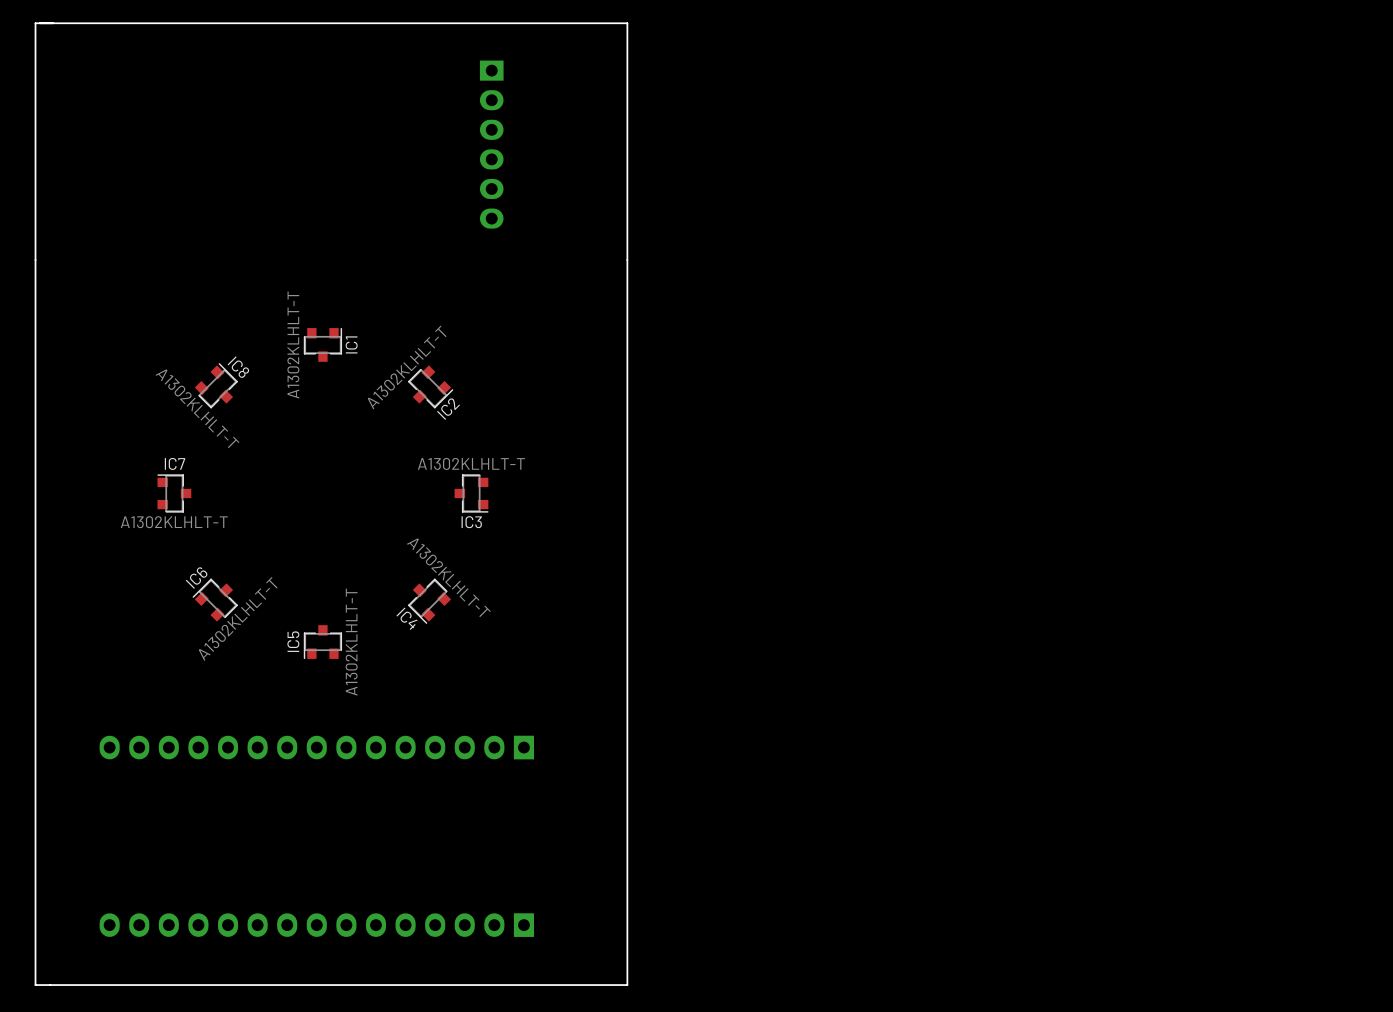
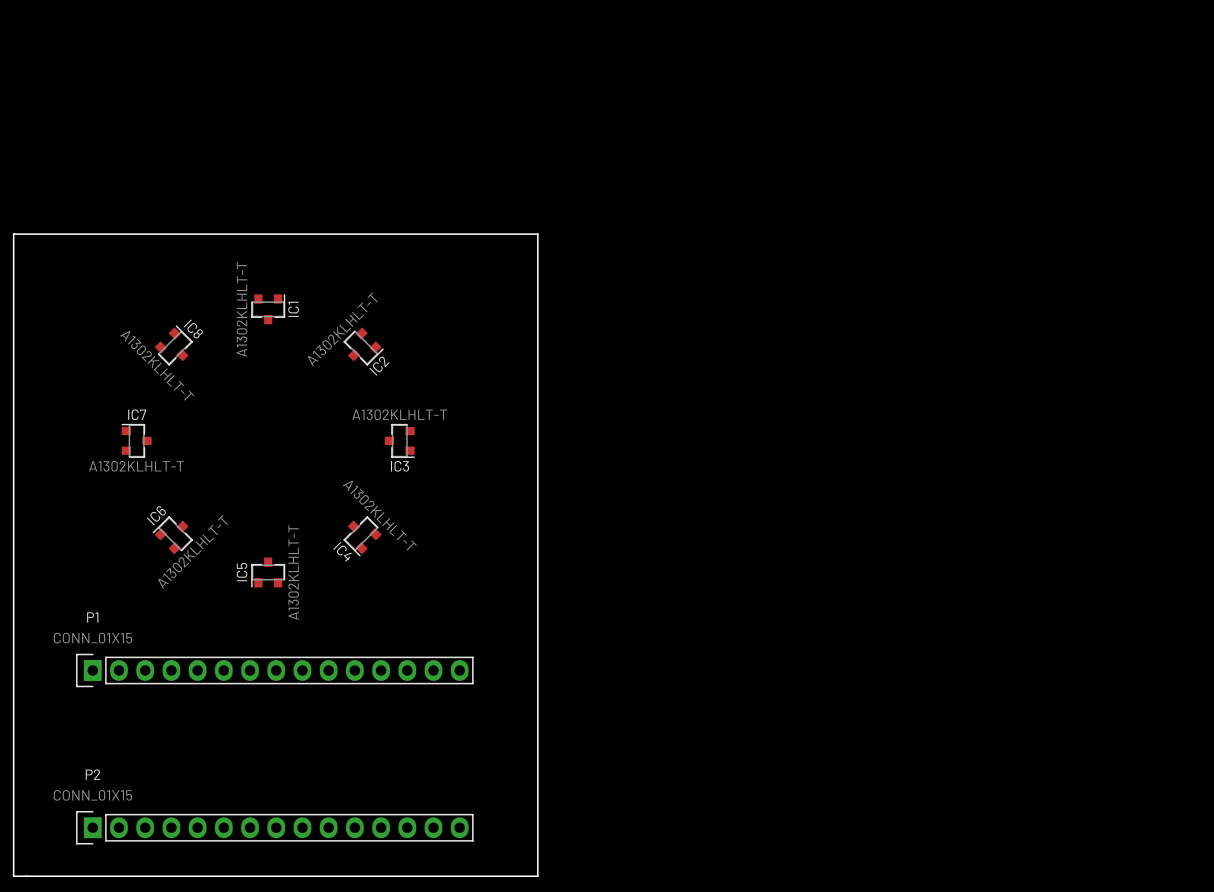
part: (491, 144) -> none
board edge: (35, 260) (35, 23) (627, 23) (627, 260) -> (13, 234) (537, 234)
P1 side: bottom (316, 747) -> top (274, 670)
P2 side: bottom (316, 925) -> top (274, 827)

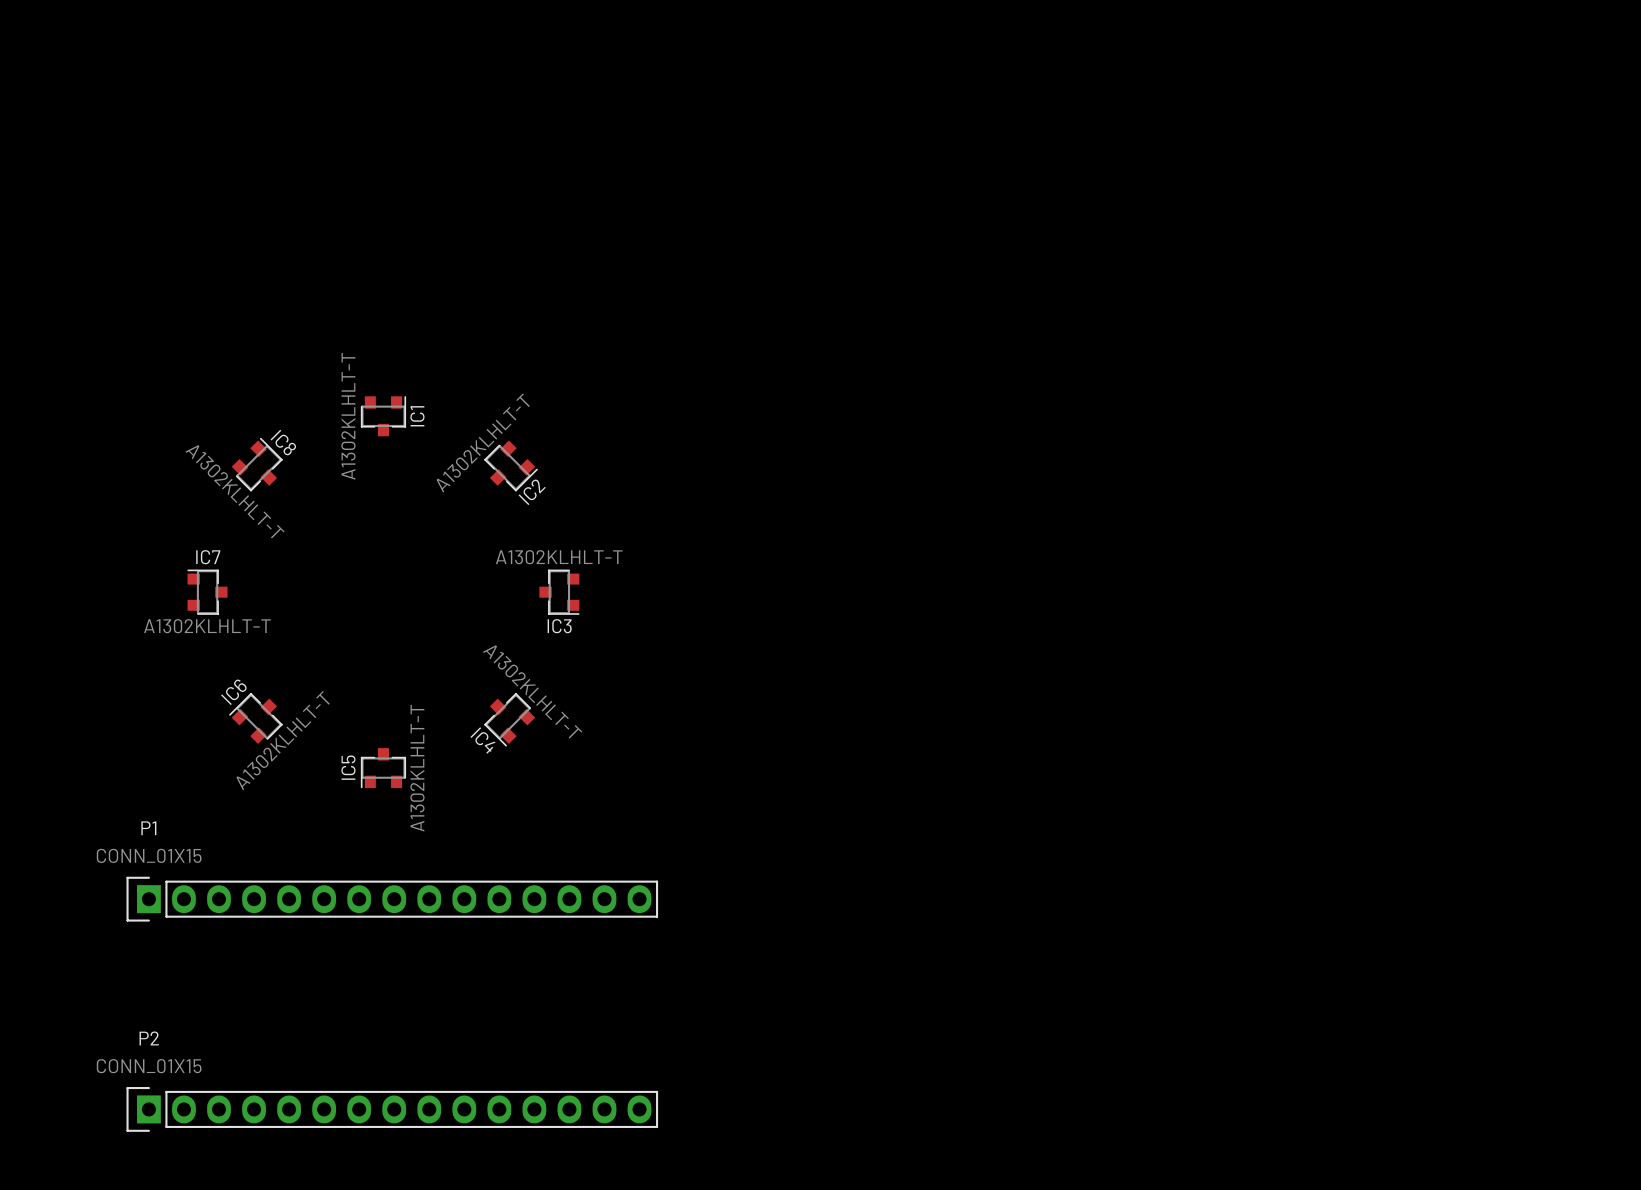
board edge: (13, 234) (13, 876) (537, 876) (537, 234) (13, 234) -> none

